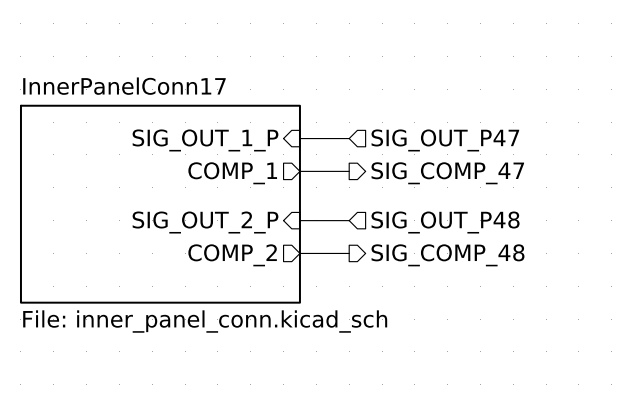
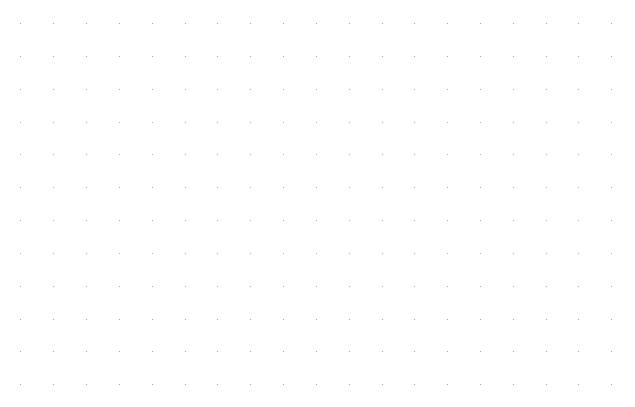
wire: (299, 138) (349, 138) -> none
sheet pin: SIG_OUT_1_P (205, 140) -> none
hierarchical label: SIG_OUT_P47 (445, 140) -> none
wire: (299, 171) (349, 171) -> none
sheet pin: COMP_1 (232, 173) -> none
hierarchical label: SIG_COMP_47 (447, 173) -> none
sheet InnerPanelConn17: File: inner_panel_conn.kicad_sch (160, 204) -> none
wire: (299, 220) (349, 220) -> none
sheet pin: SIG_OUT_2_P (205, 222) -> none
hierarchical label: SIG_OUT_P48 (445, 222) -> none
wire: (299, 253) (349, 253) -> none
sheet pin: COMP_2 (232, 255) -> none
hierarchical label: SIG_COMP_48 (447, 255) -> none

